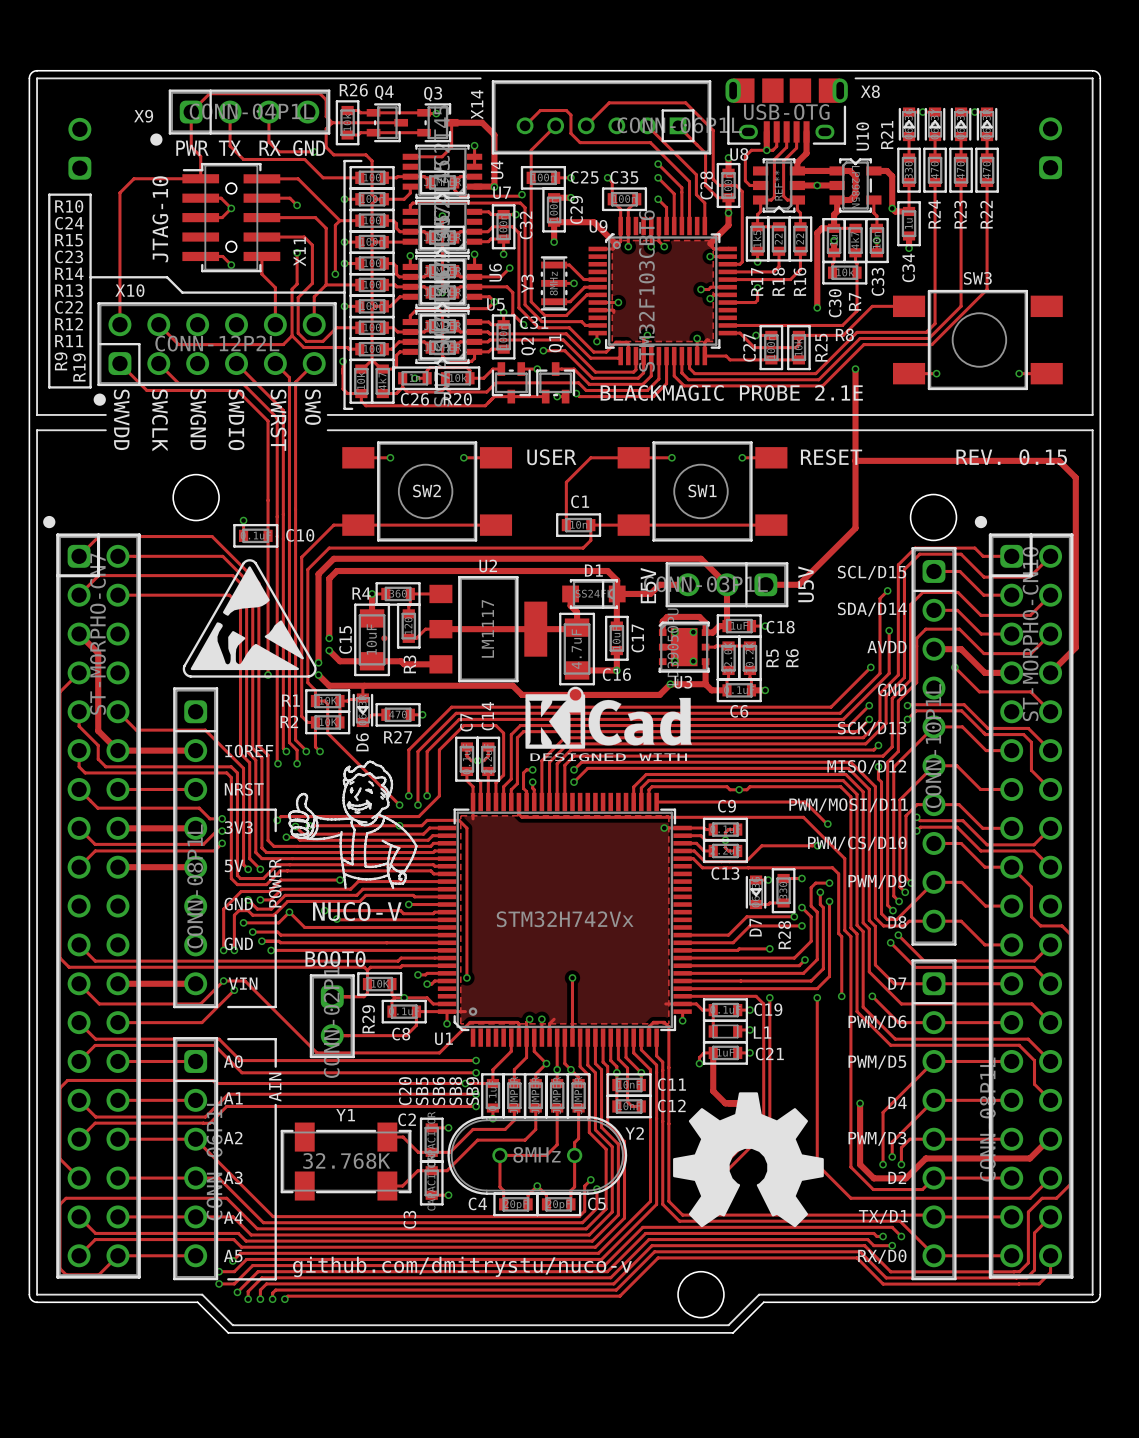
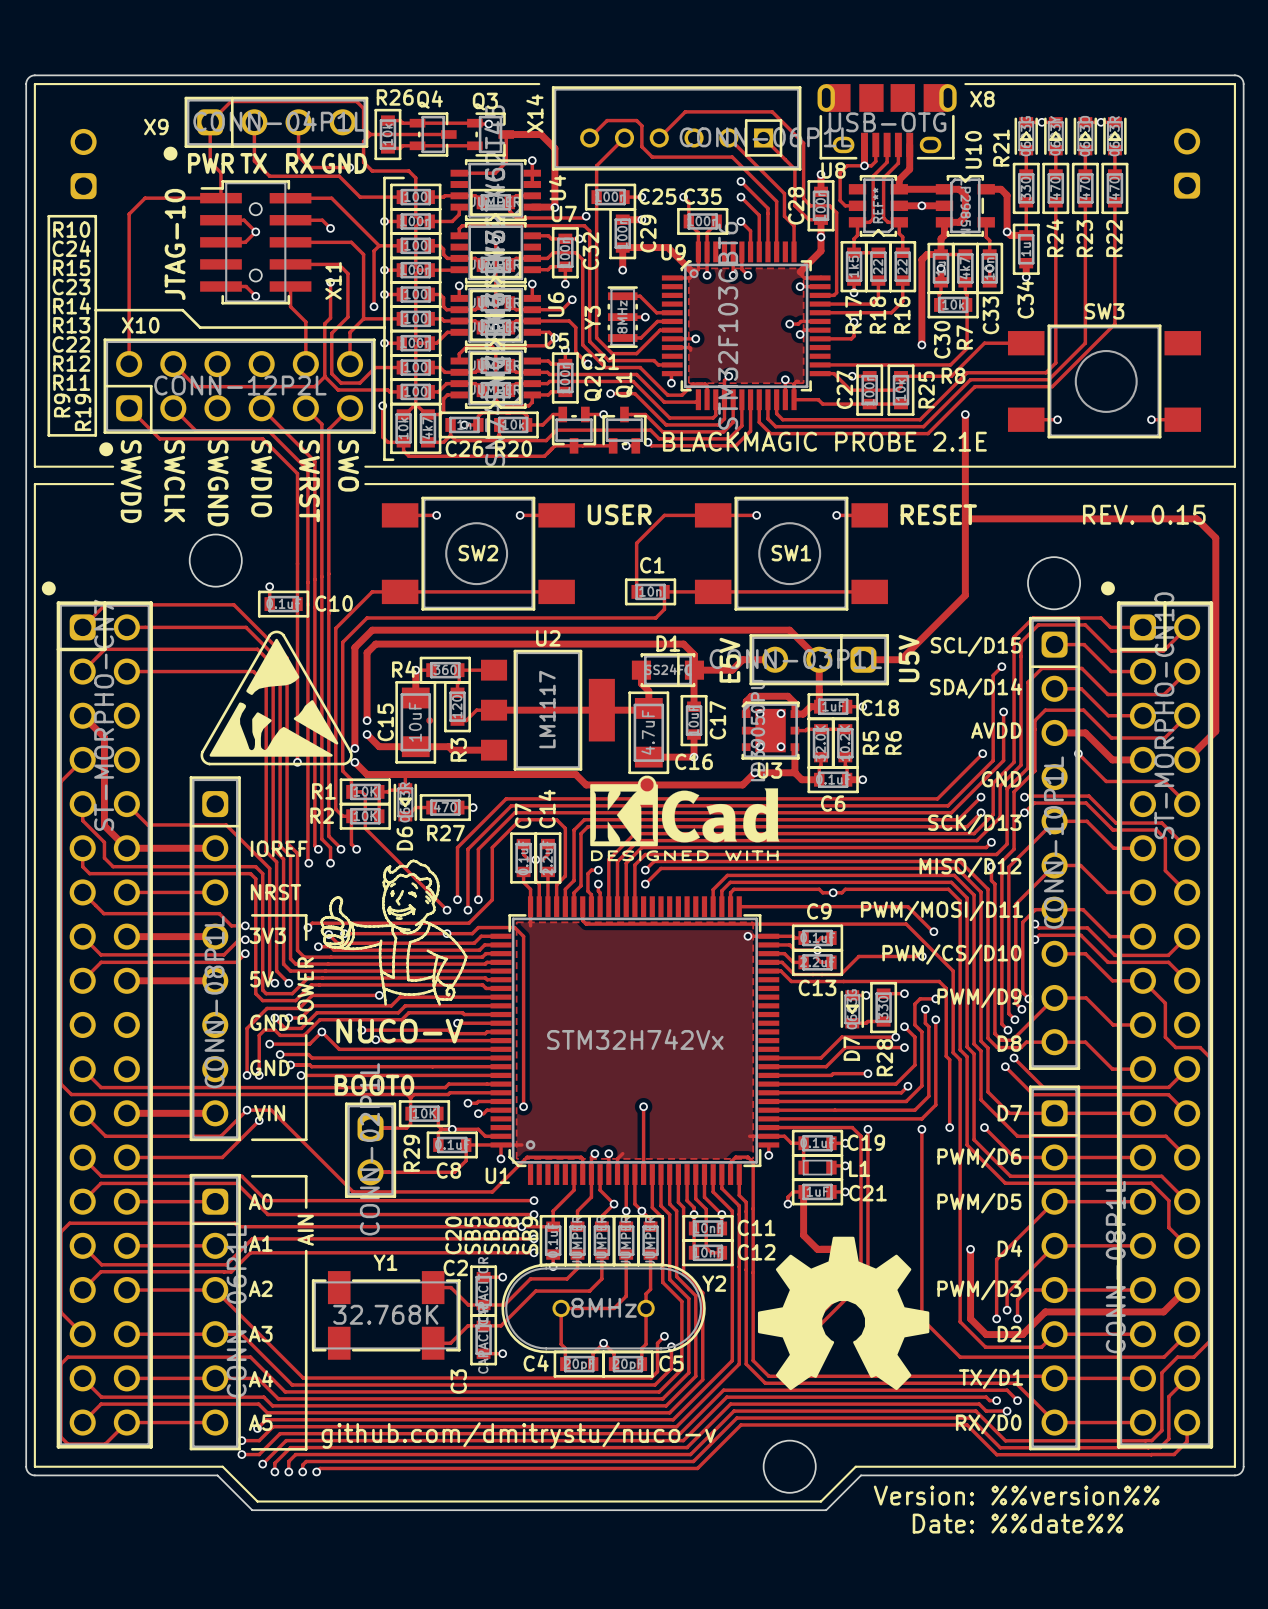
text: none -> Version: %%version%% (1016, 1495)
text: none -> Date: %%date%% (1017, 1523)

